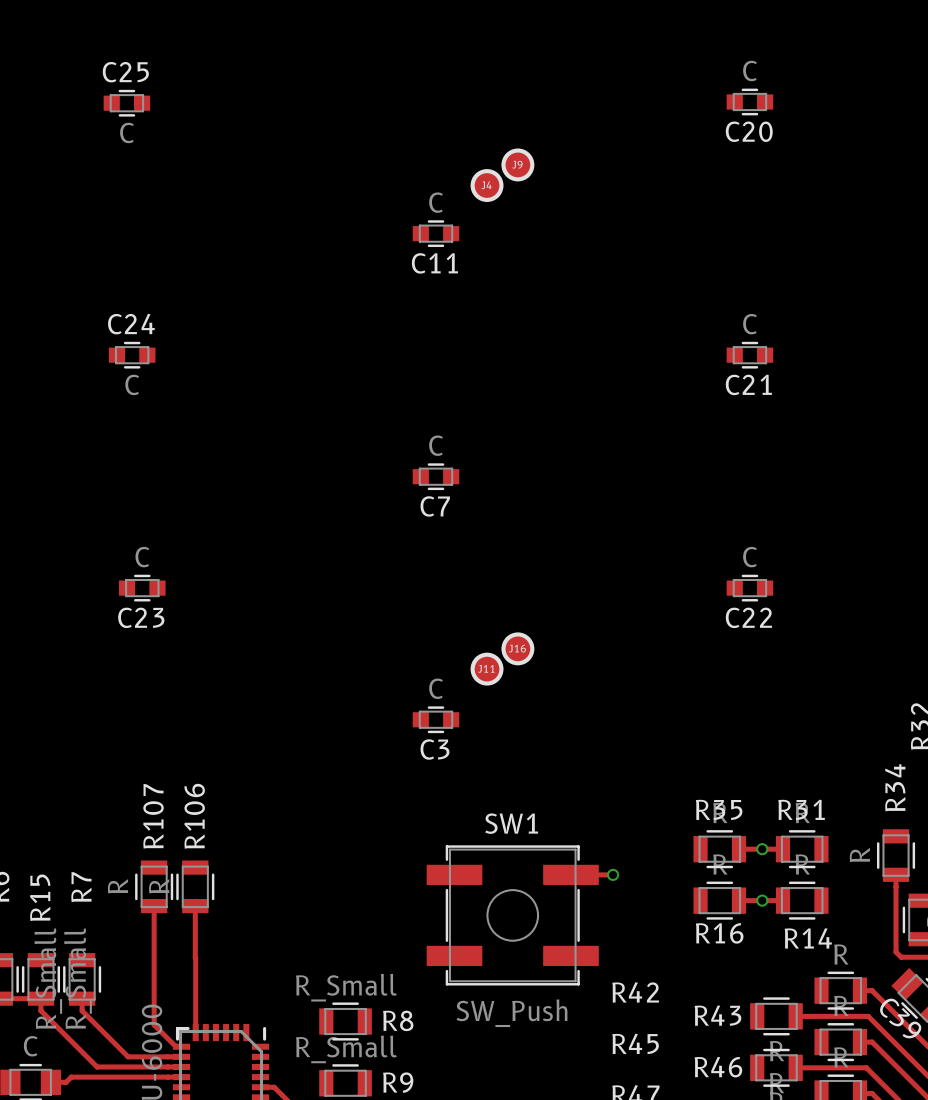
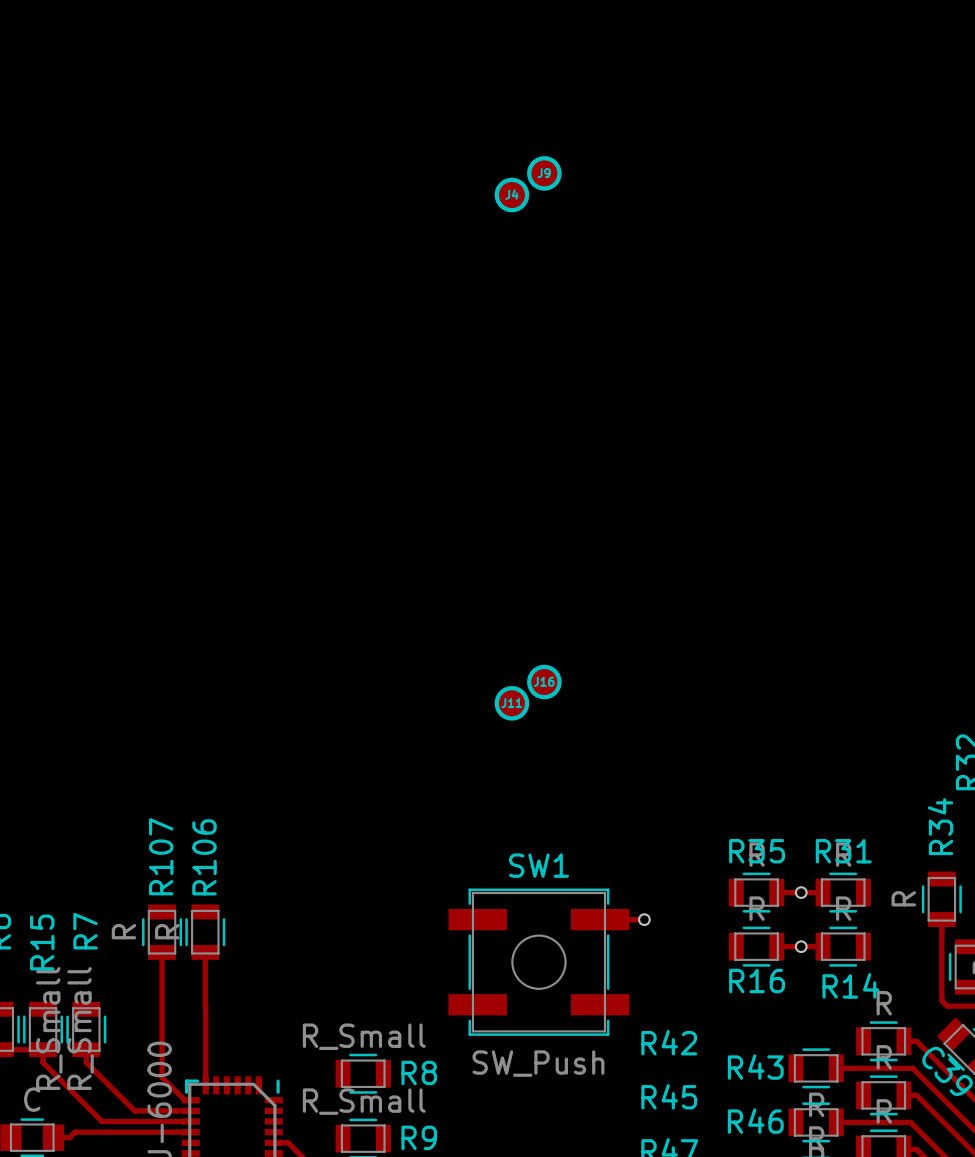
C20: C (749, 101) -> none
C25: C (126, 103) -> none
C11: C (435, 233) -> none
C24: C (132, 355) -> none
C21: C (749, 355) -> none
C7: C (435, 476) -> none
C23: C (142, 588) -> none
C22: C (749, 588) -> none
C3: C (435, 719) -> none

